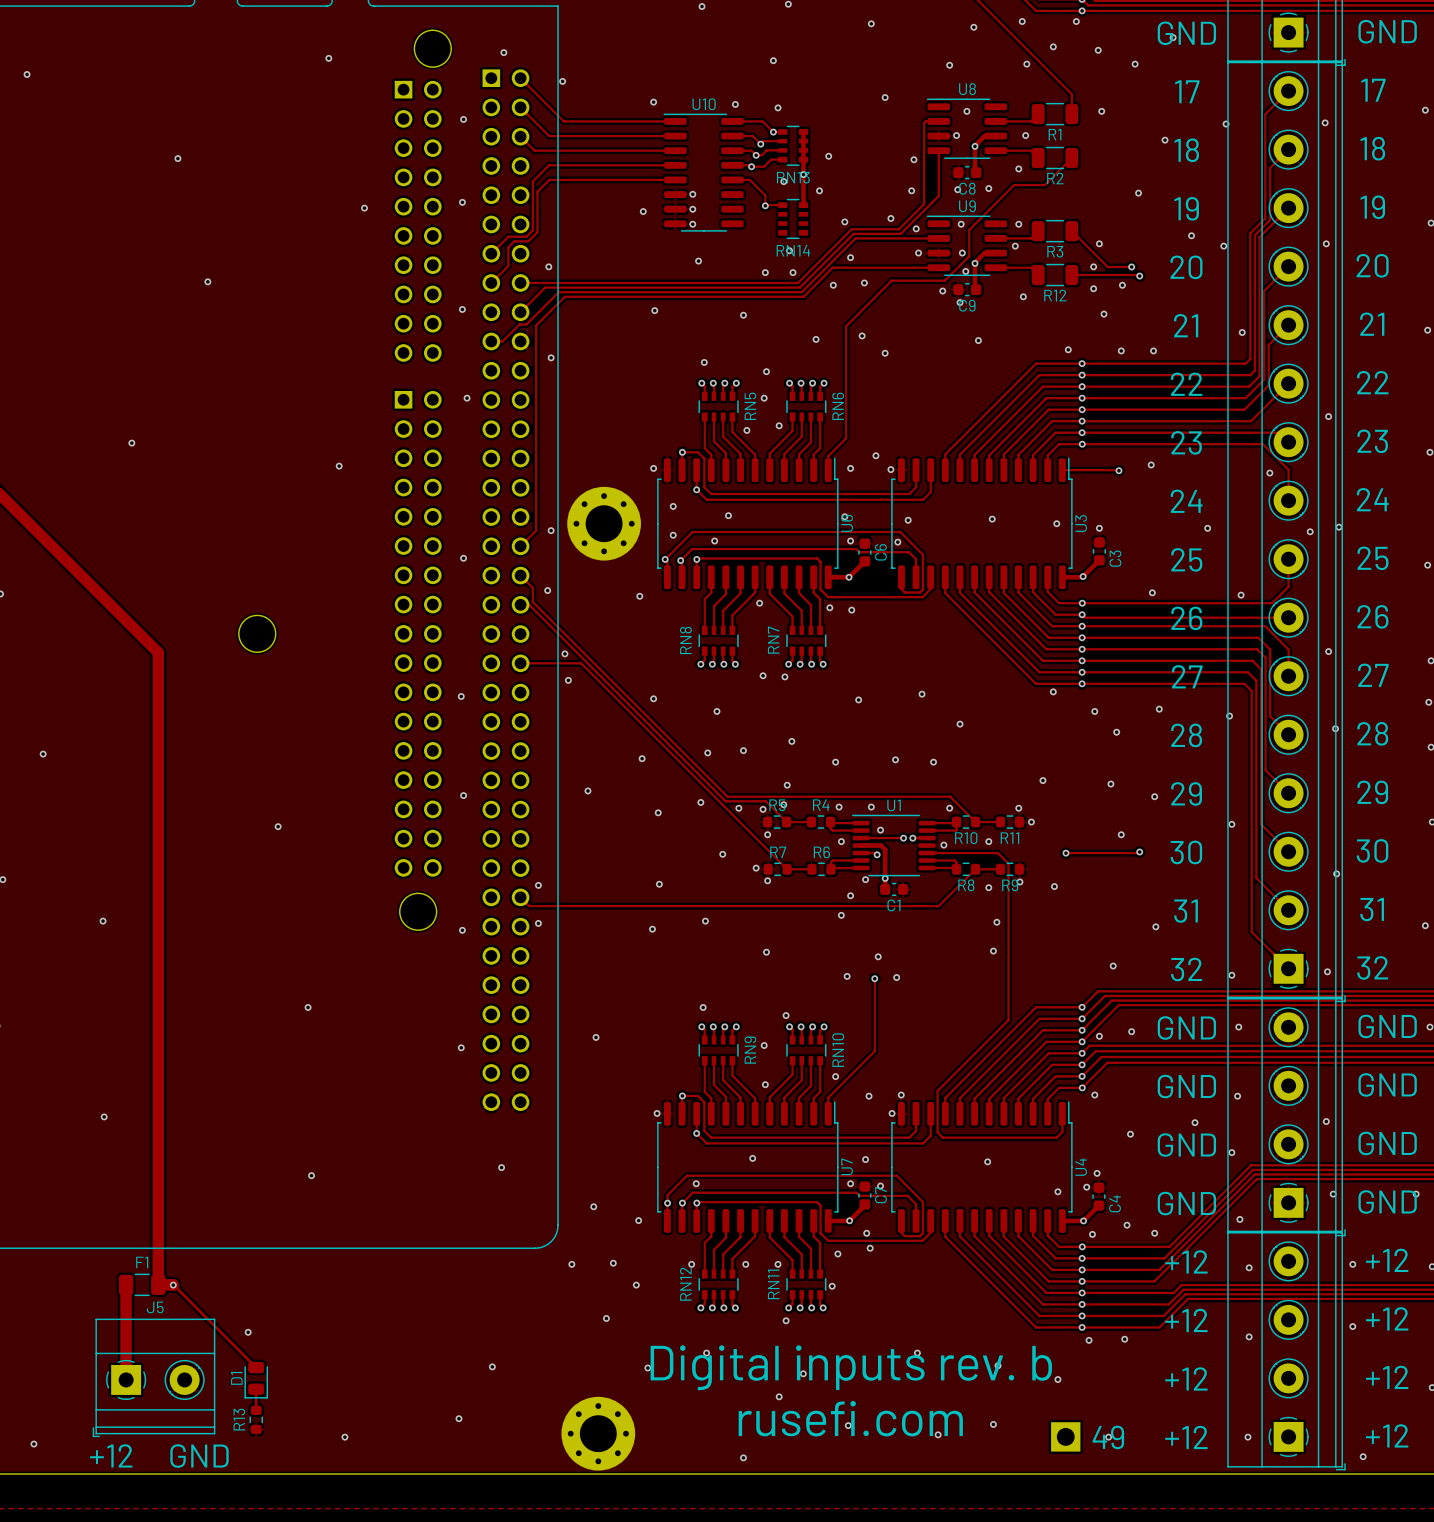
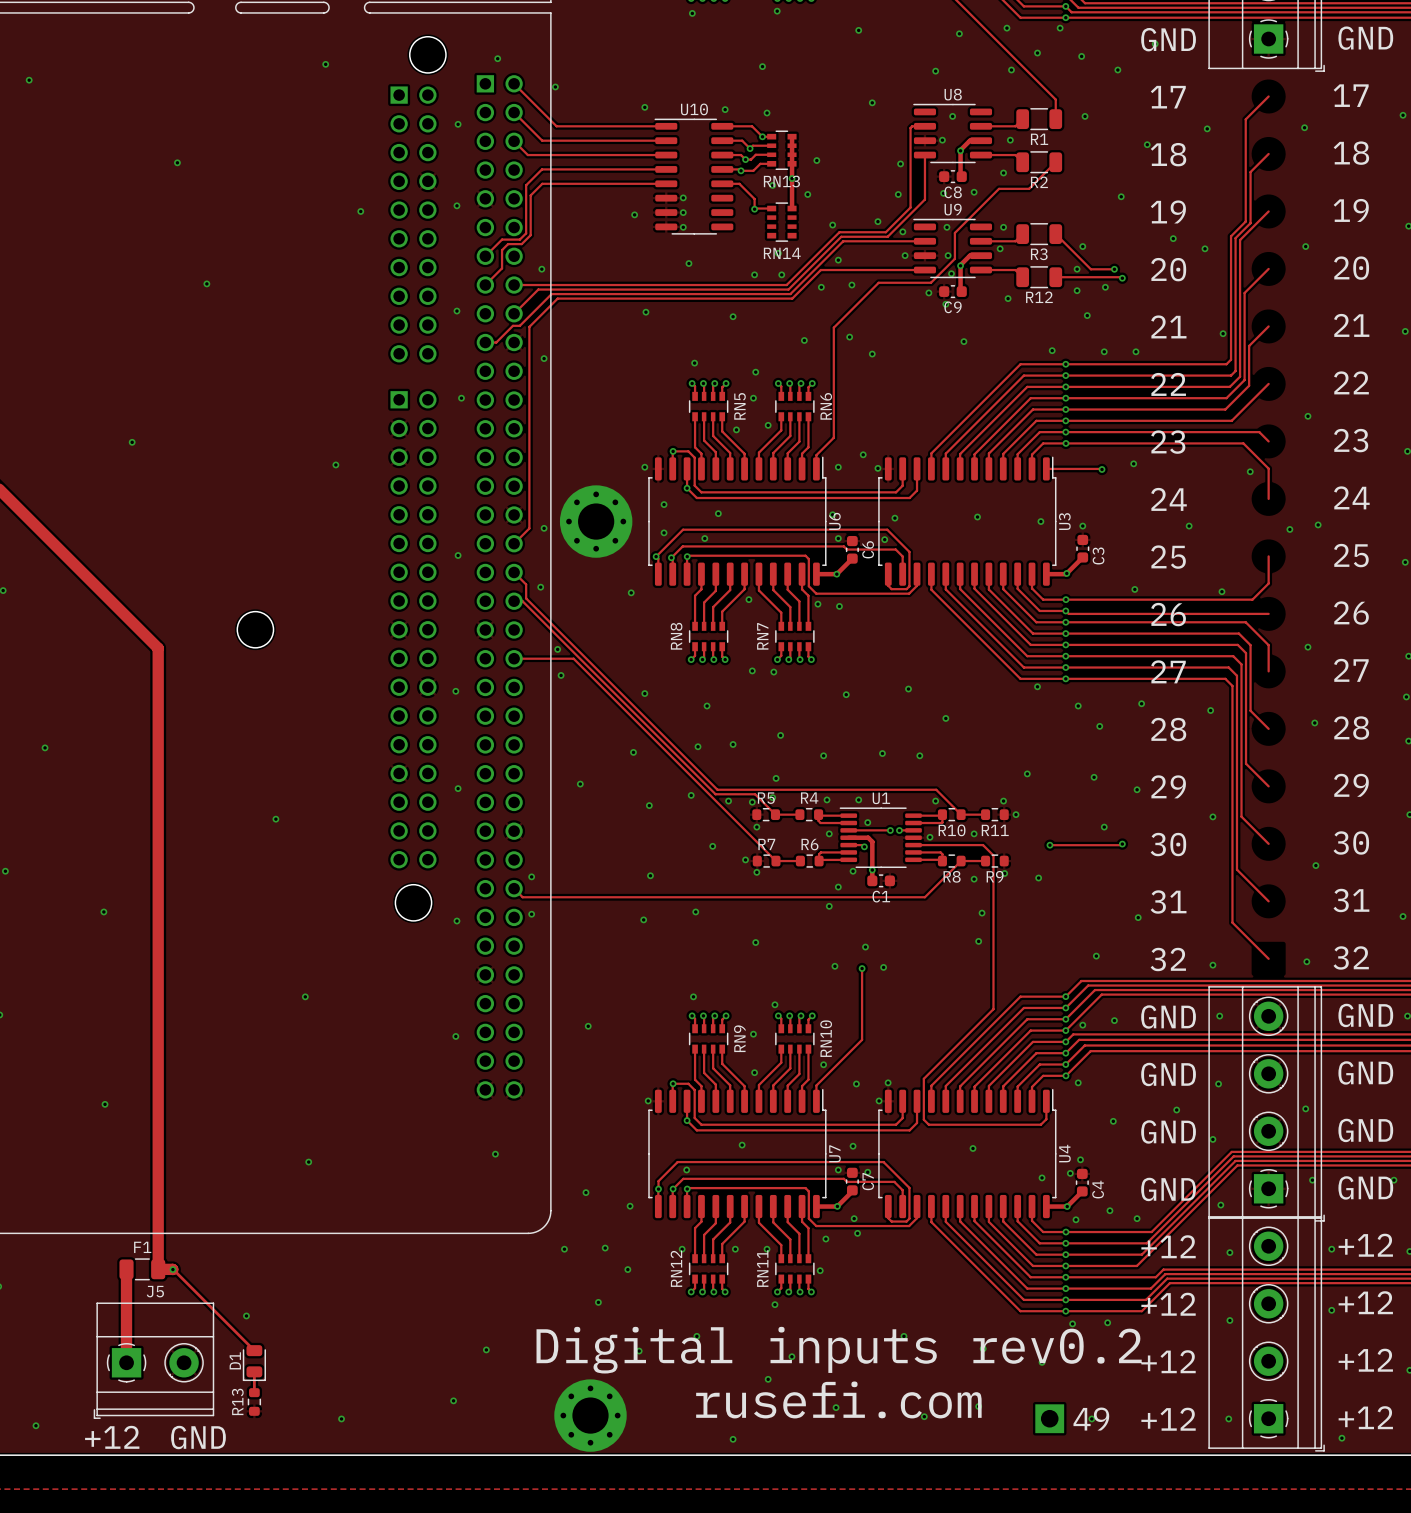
part: (1286, 531) -> none
text: Digital inputs rev. b (851, 1367) -> Digital inputs rev0.2 (839, 1350)

